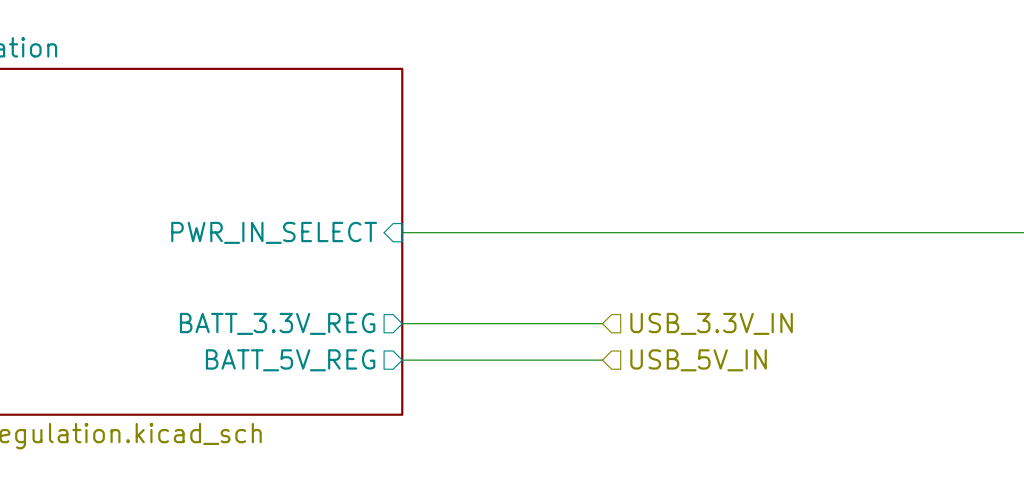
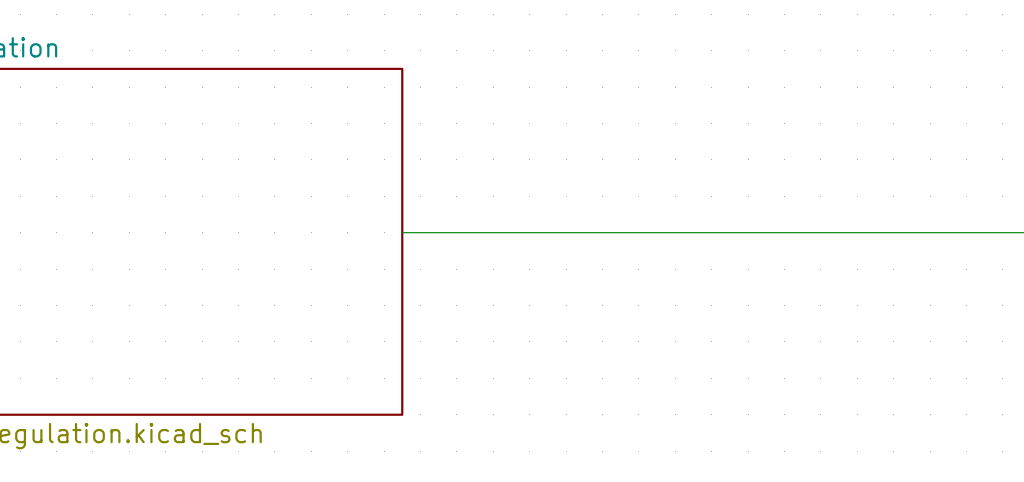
sheet pin: PWR_IN_SELECT (274, 232) -> none
sheet pin: BATT_3.3V_REG (277, 323) -> none
wire: (402, 323) (602, 323) -> none
hierarchical label: USB_3.3V_IN (711, 323) -> none
sheet pin: BATT_5V_REG (290, 360) -> none
wire: (402, 360) (602, 360) -> none
hierarchical label: USB_5V_IN (698, 360) -> none

